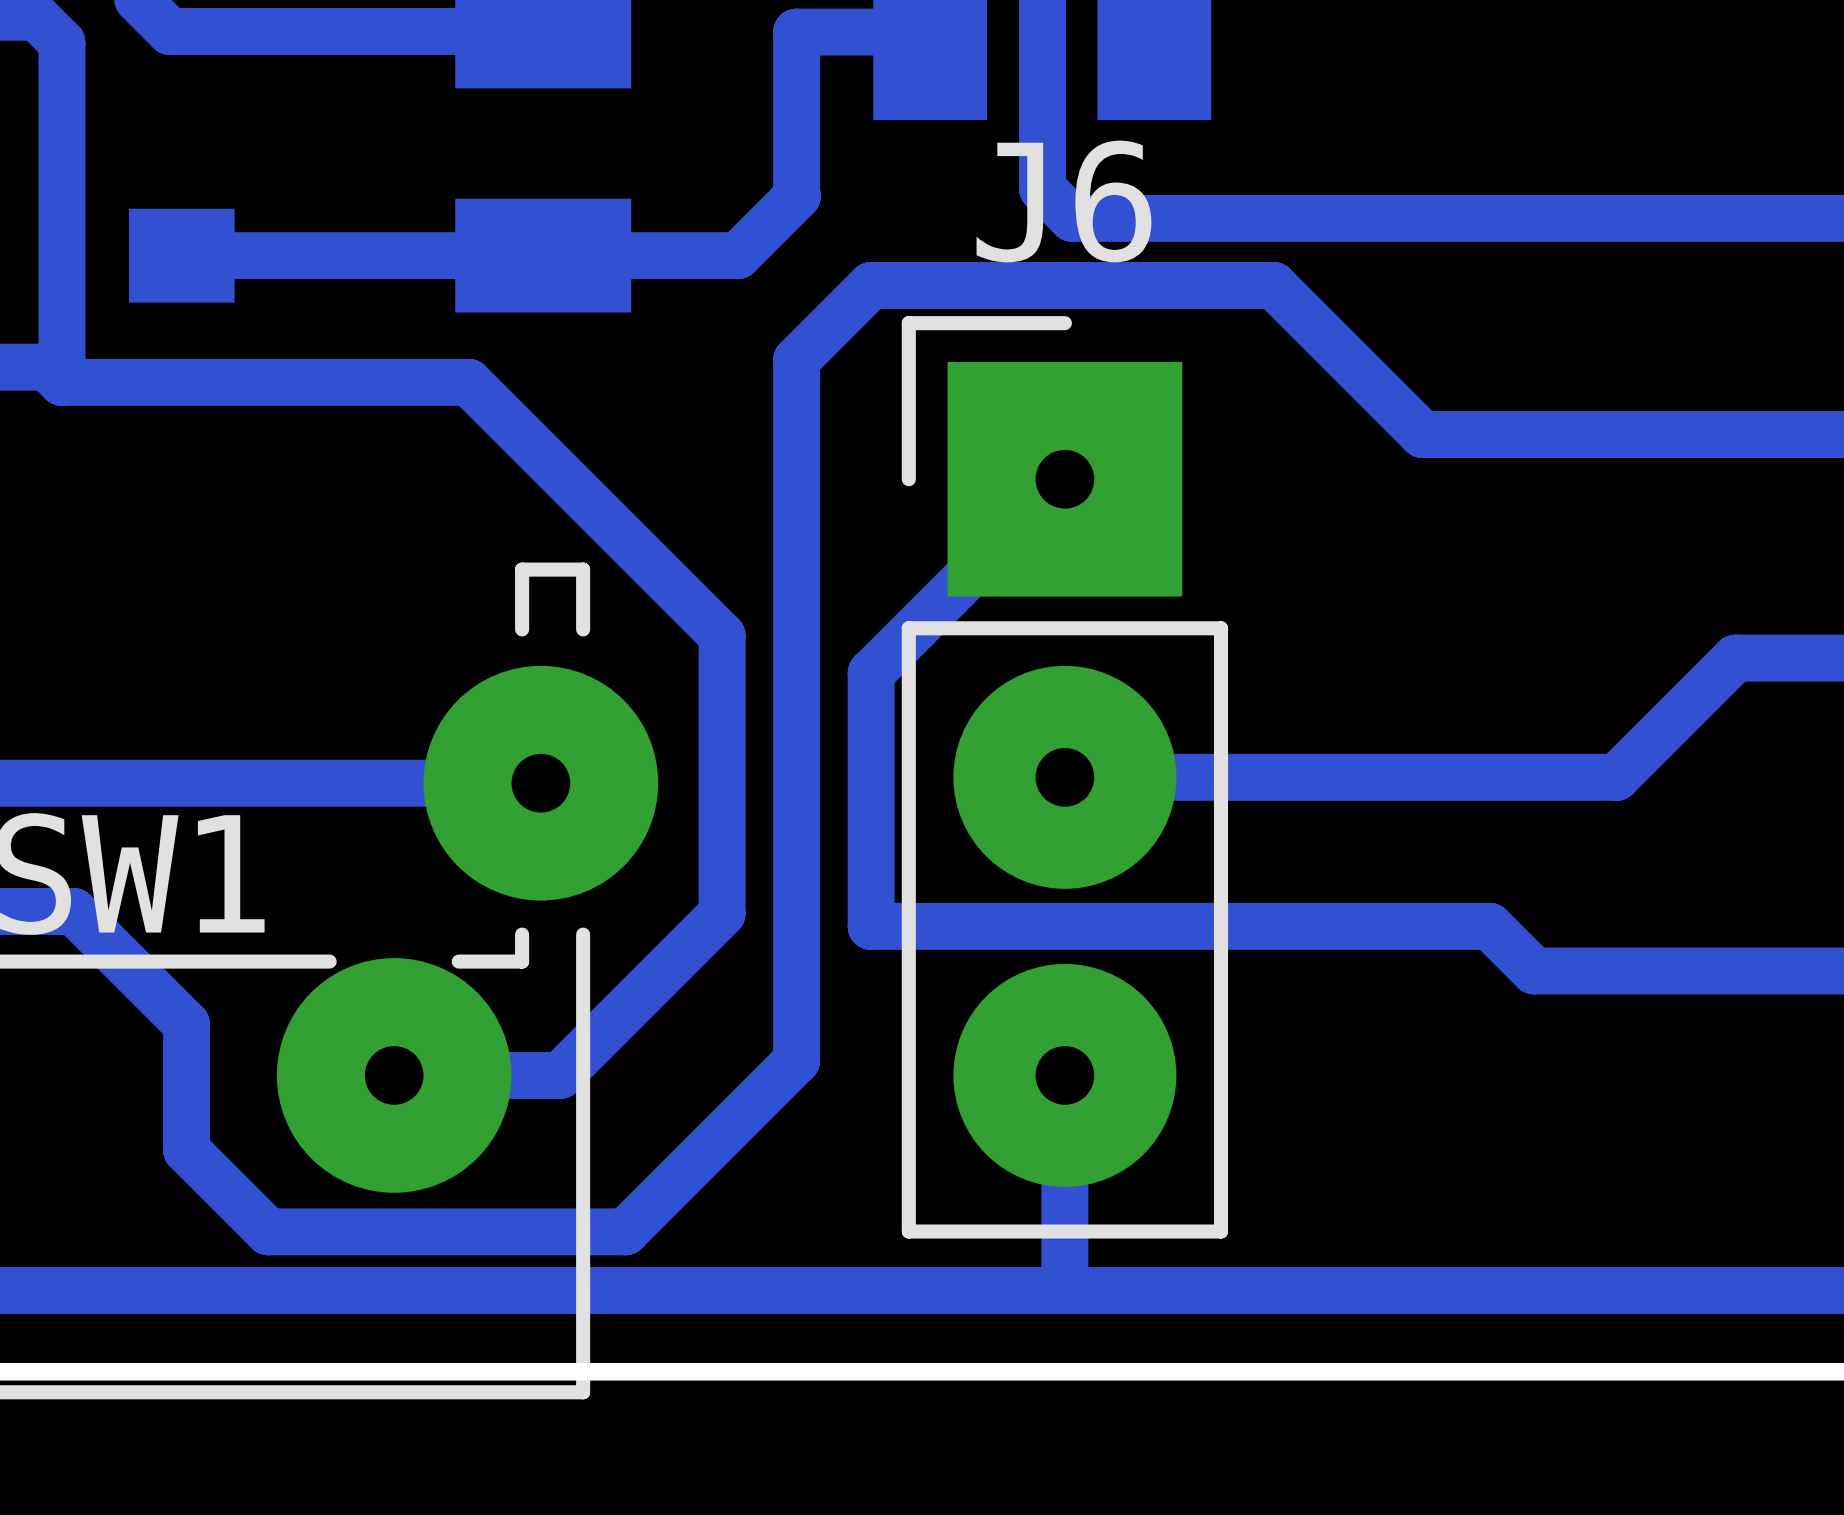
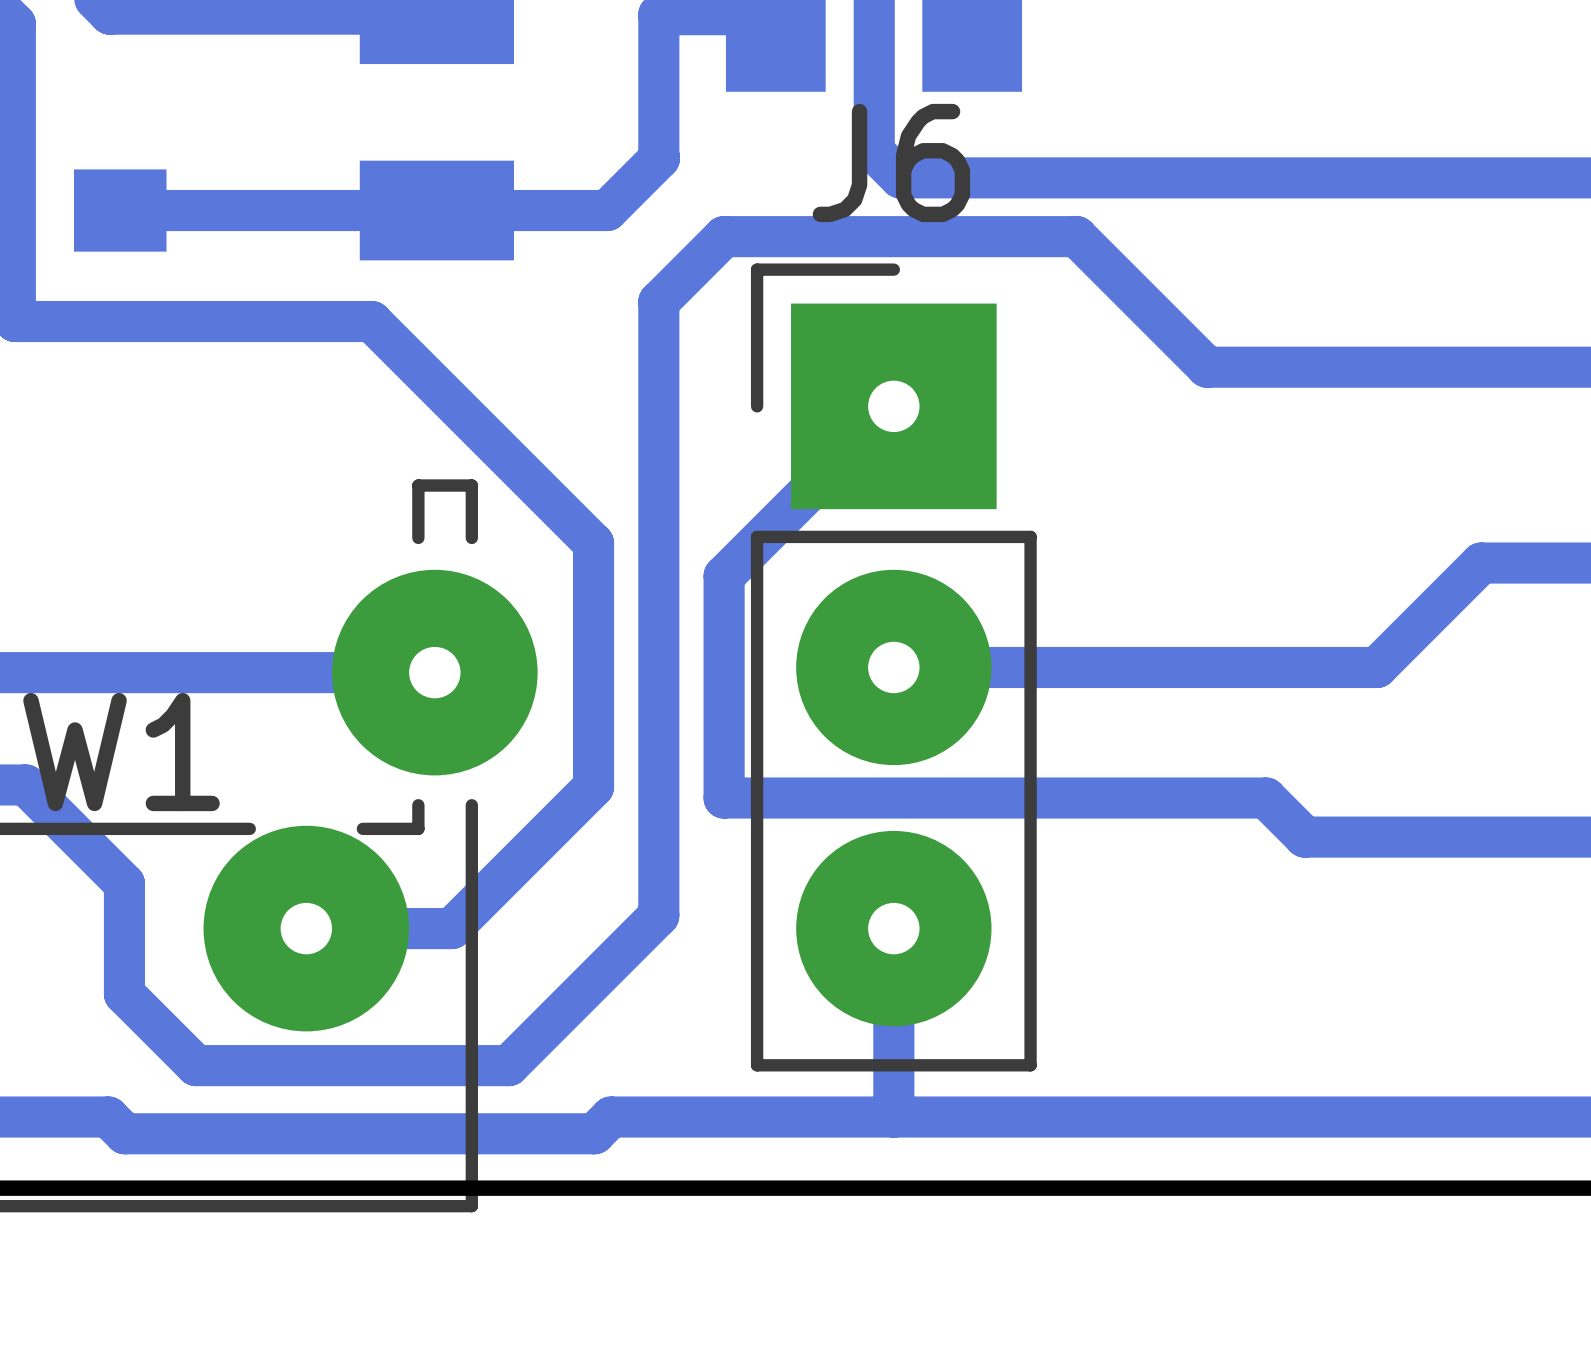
bottom track: (168, 1290) (742, 1290) -> (108, 1117) (124, 1133) (594, 1133) (611, 1117)

